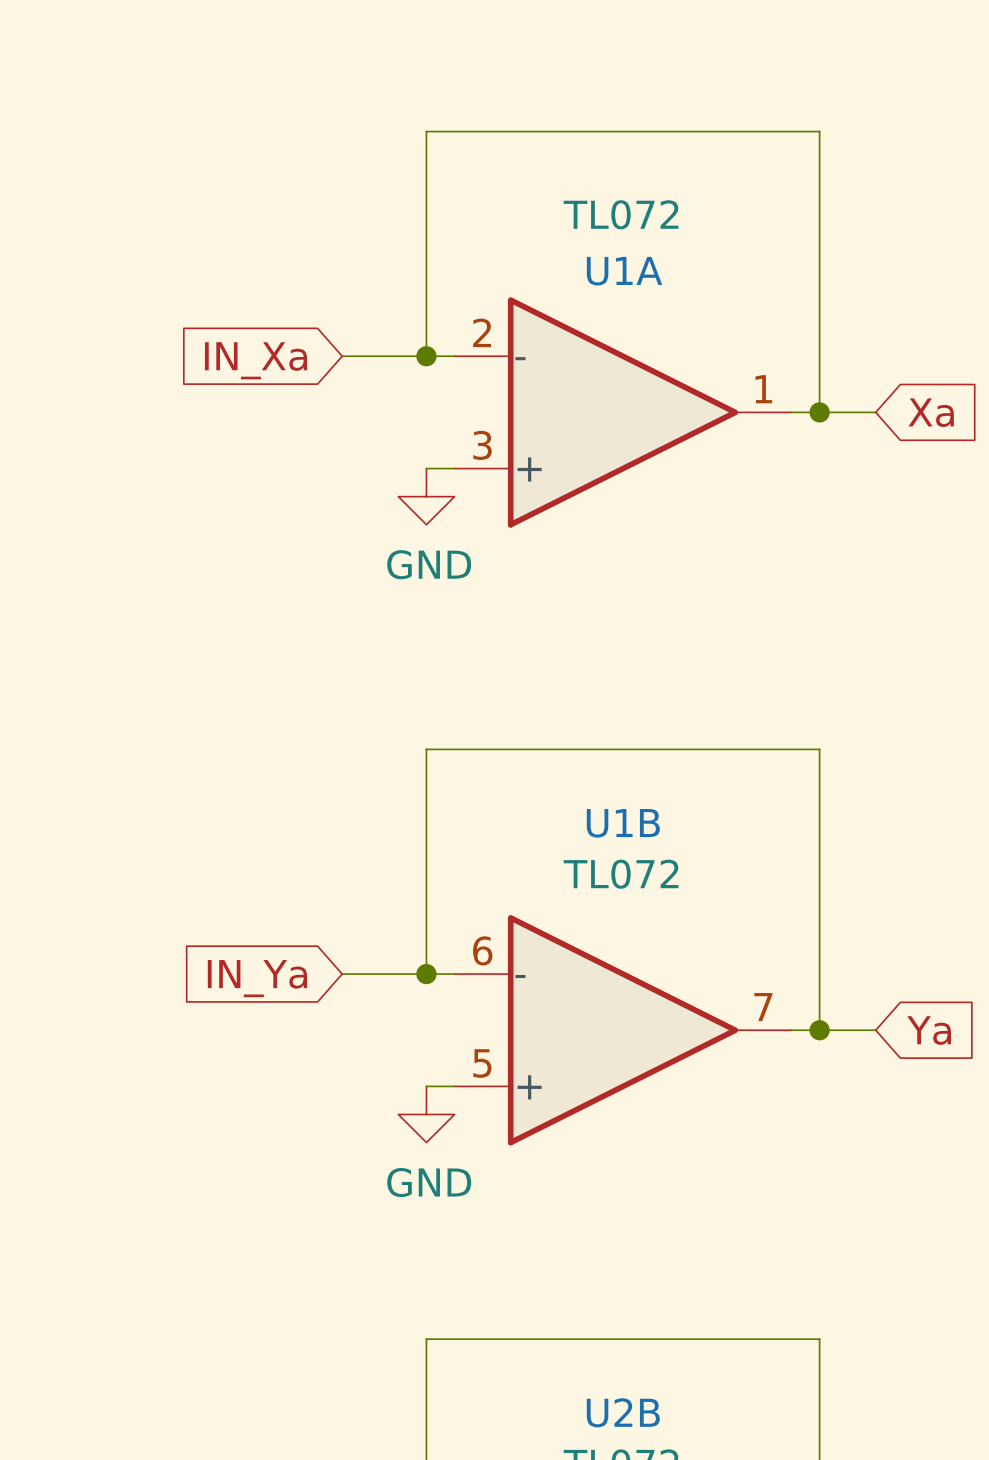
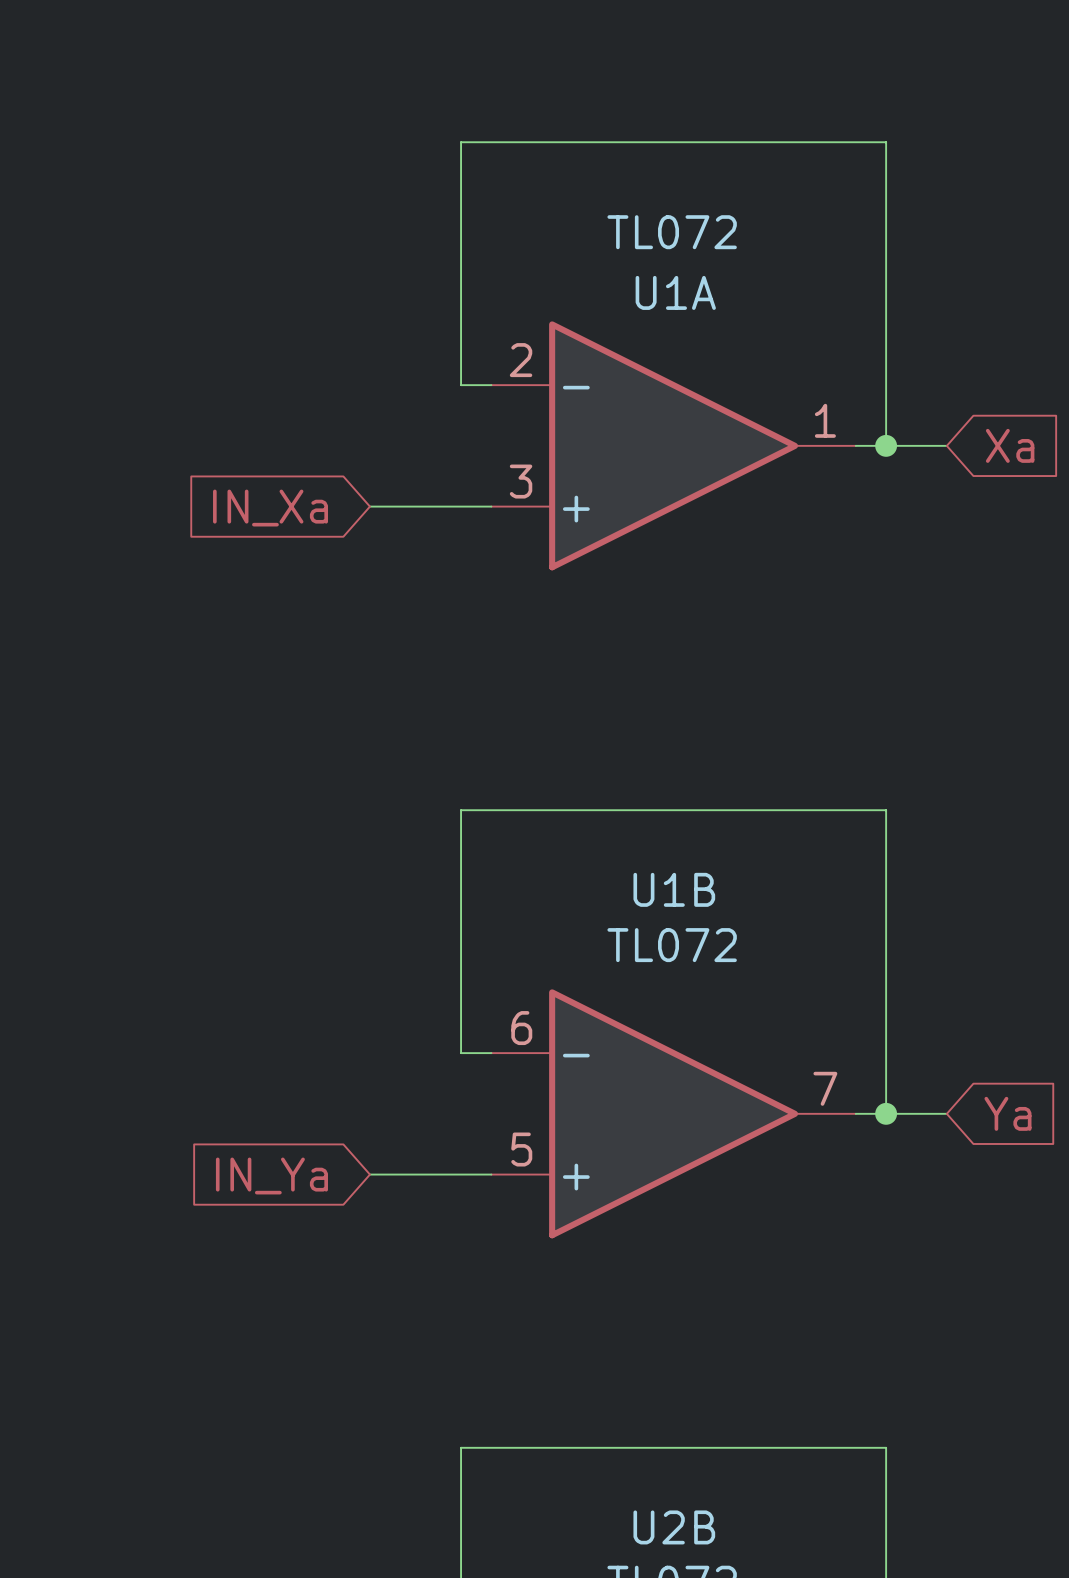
wire: (342, 356) (426, 356) -> (369, 506) (461, 506)
junction: (426, 356) -> none
global label position: IN_Xa (256, 360) -> IN_Xa (270, 508)
power symbol: GND (426, 496) -> none
wire: (342, 974) (426, 974) -> (369, 1174) (461, 1174)
junction: (426, 974) -> none
global label position: IN_Ya (257, 978) -> IN_Ya (271, 1176)
power symbol: GND (426, 1114) -> none

